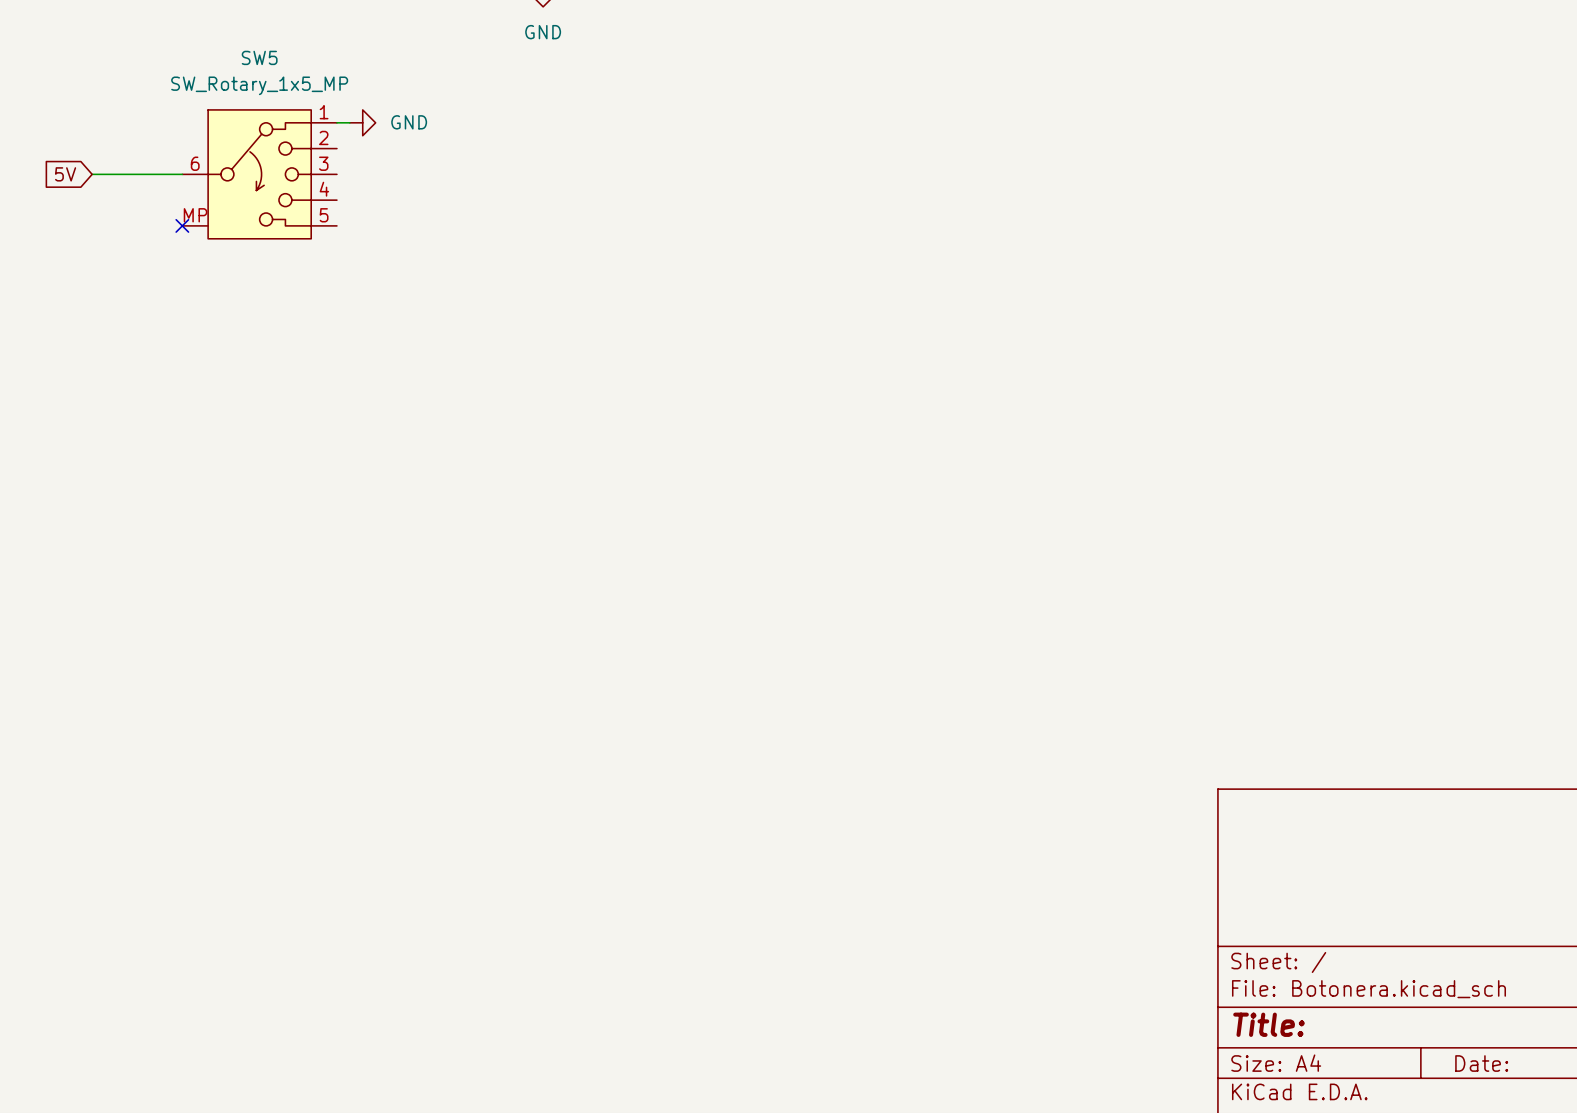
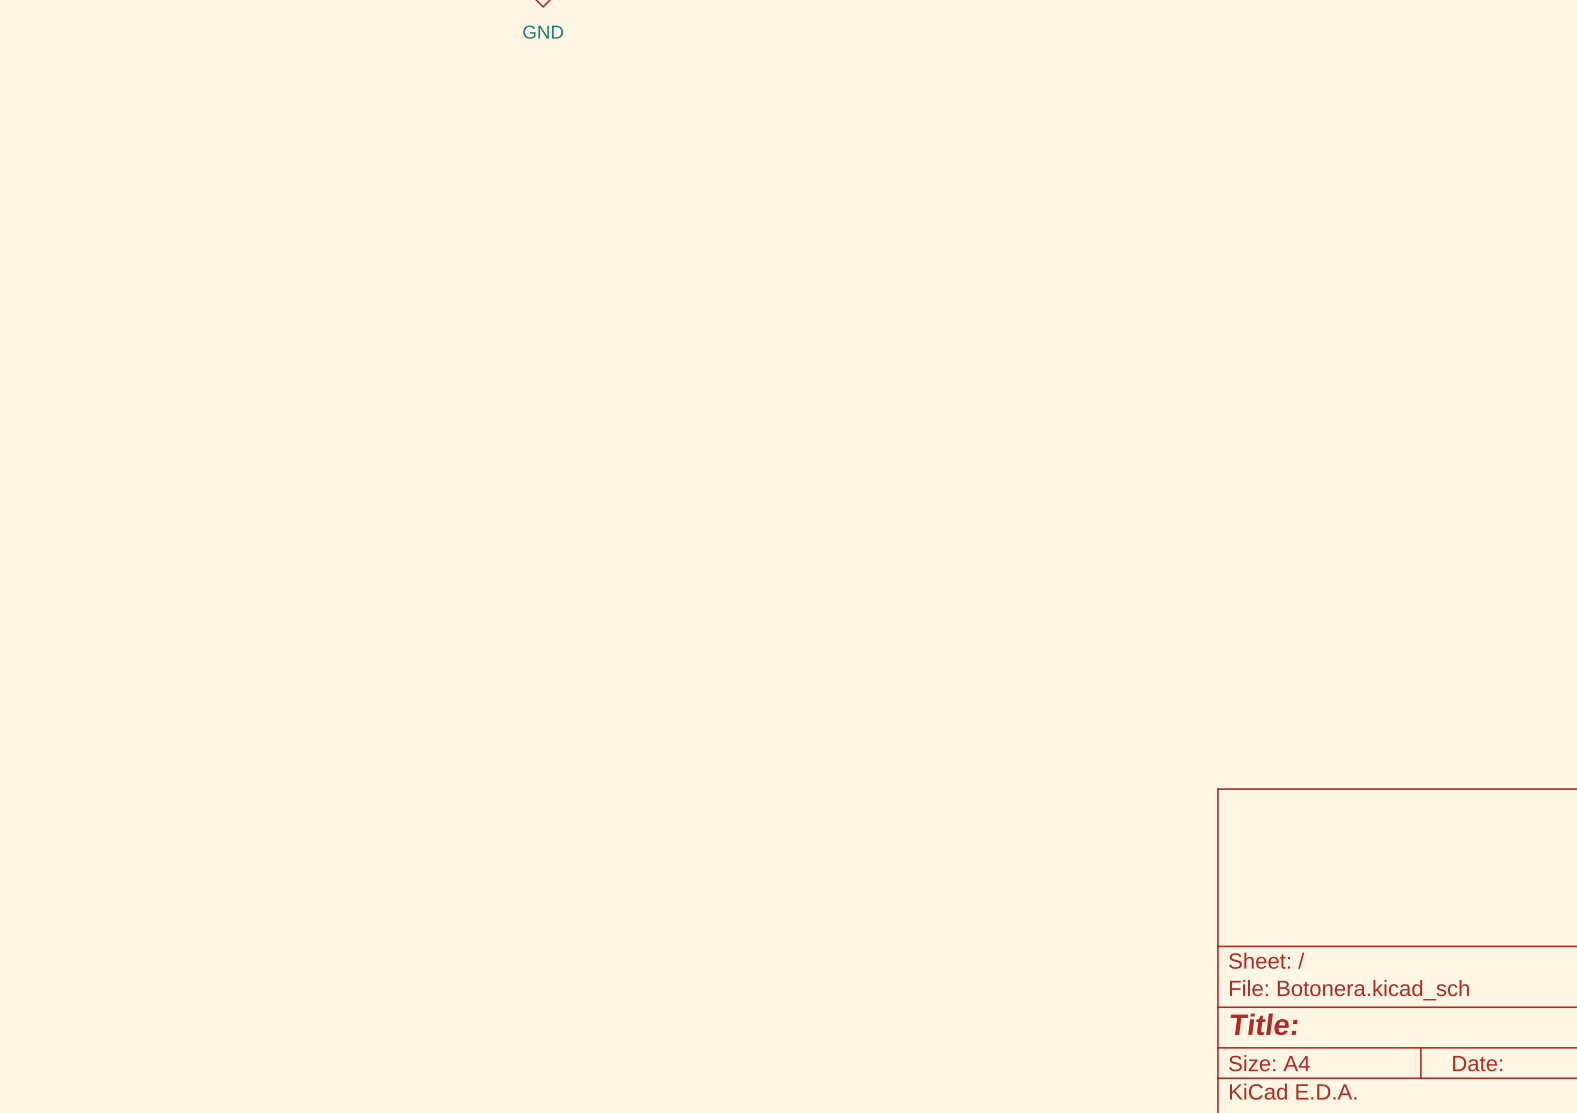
wire: (336, 122) (349, 122) -> none
power symbol: GND (362, 122) -> none
global label: 5V (65, 174) -> none
wire: (92, 174) (182, 174) -> none
SW5: SW_Rotary_1x5_MP (259, 174) -> none
no-connect mark: (182, 225) -> none

